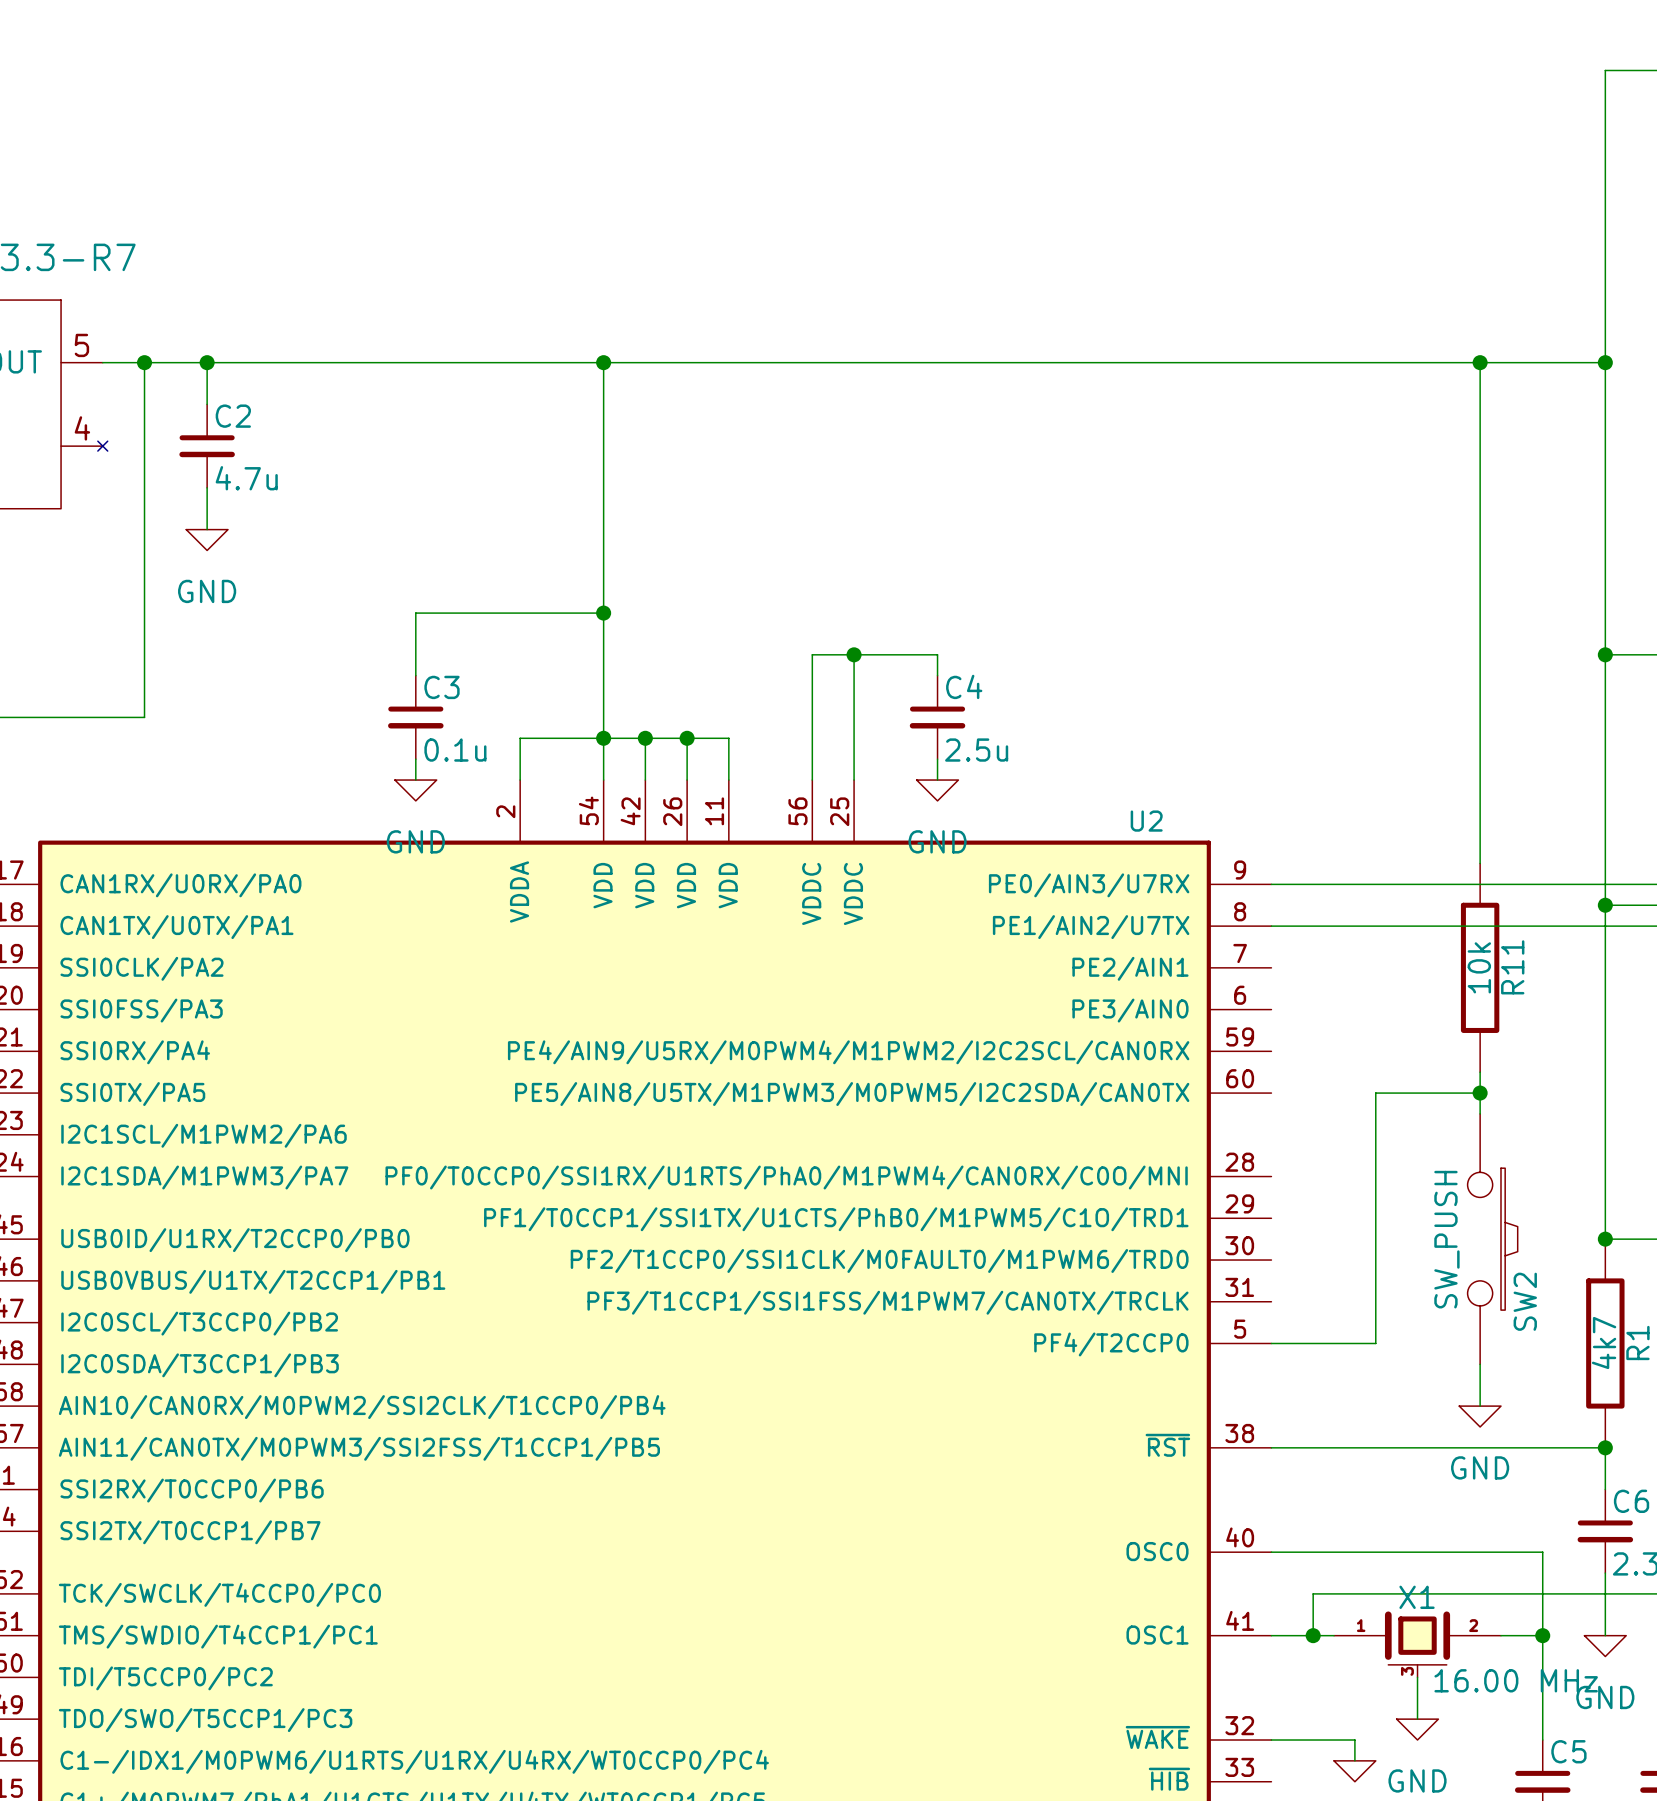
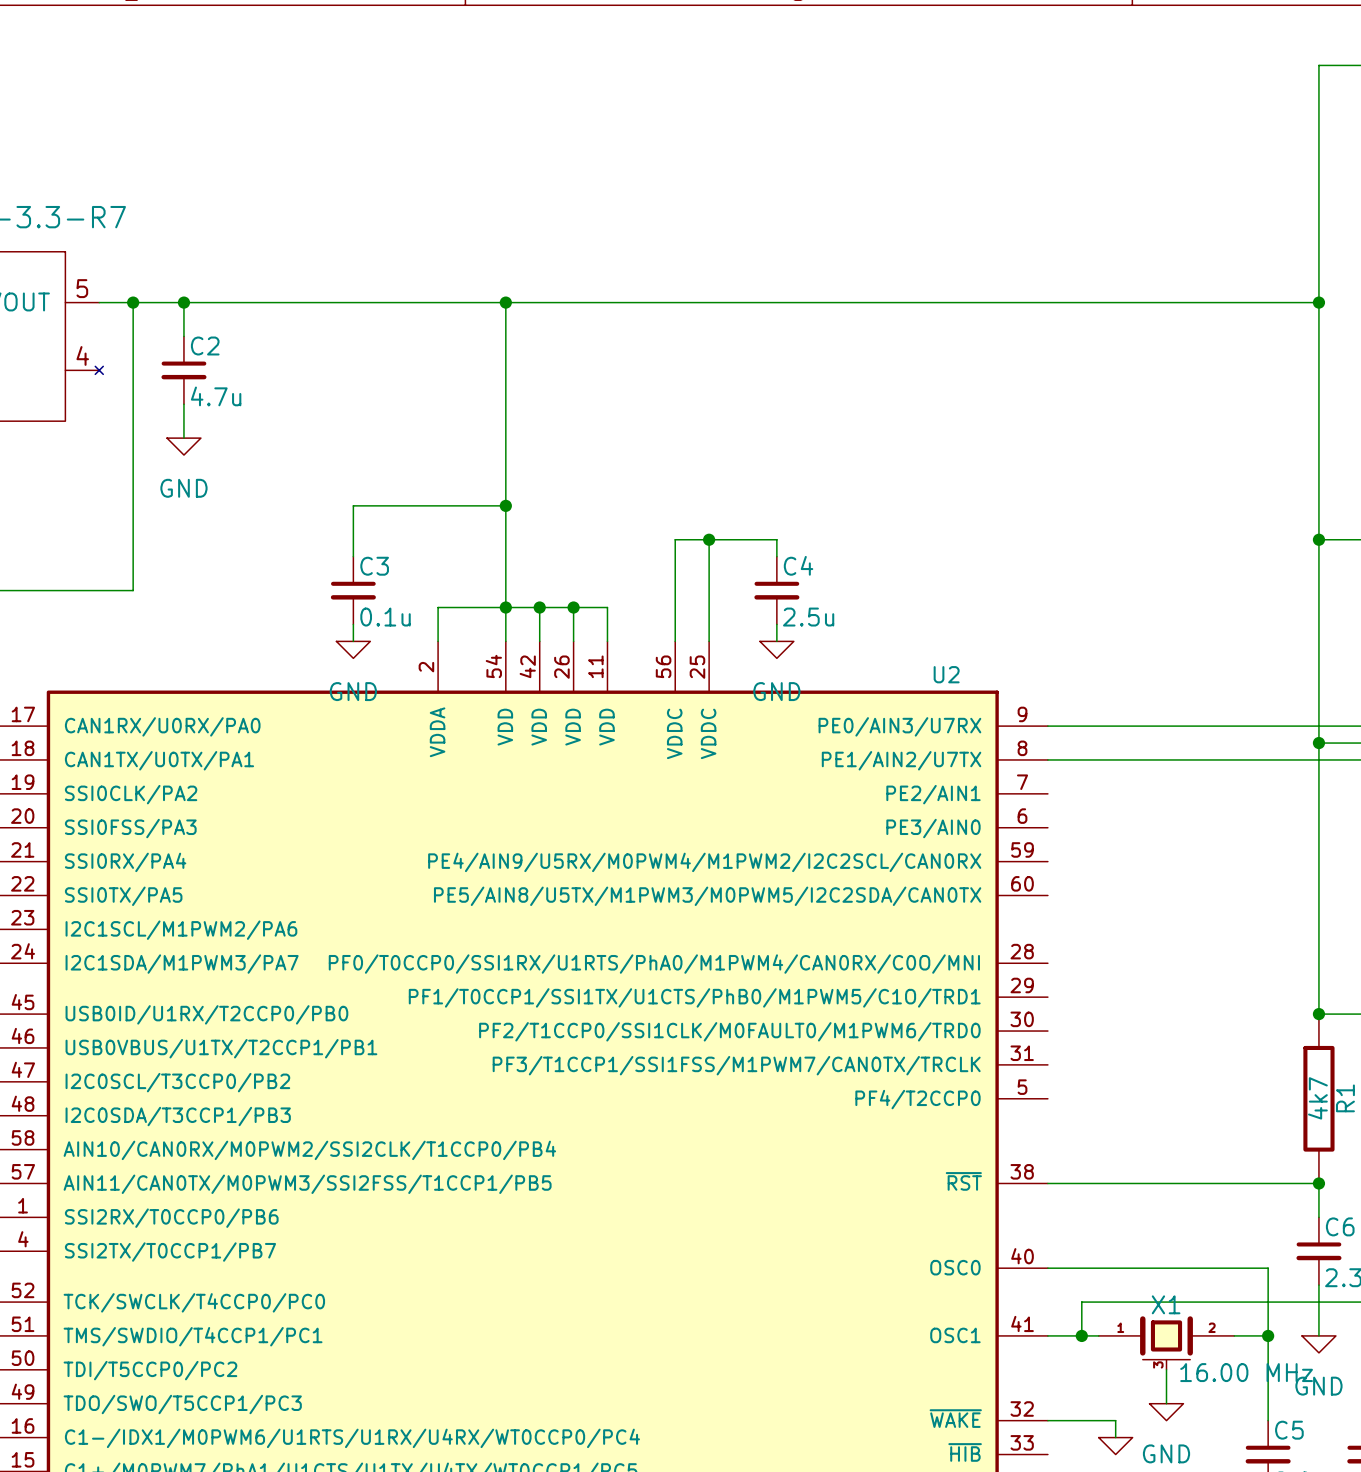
wire: (1480, 362) (1480, 863) -> none
junction: (1480, 362) -> none
R11: 10k (1480, 967) -> none
wire: (1480, 1072) (1480, 1113) -> none
wire: (1480, 1093) (1375, 1093) (1375, 1343) (1271, 1343) -> none
junction: (1480, 1093) -> none
SW2: SW_PUSH (1492, 1239) -> none
wire: (1480, 1364) (1480, 1406) -> none
power symbol: GND (1480, 1416) -> none

